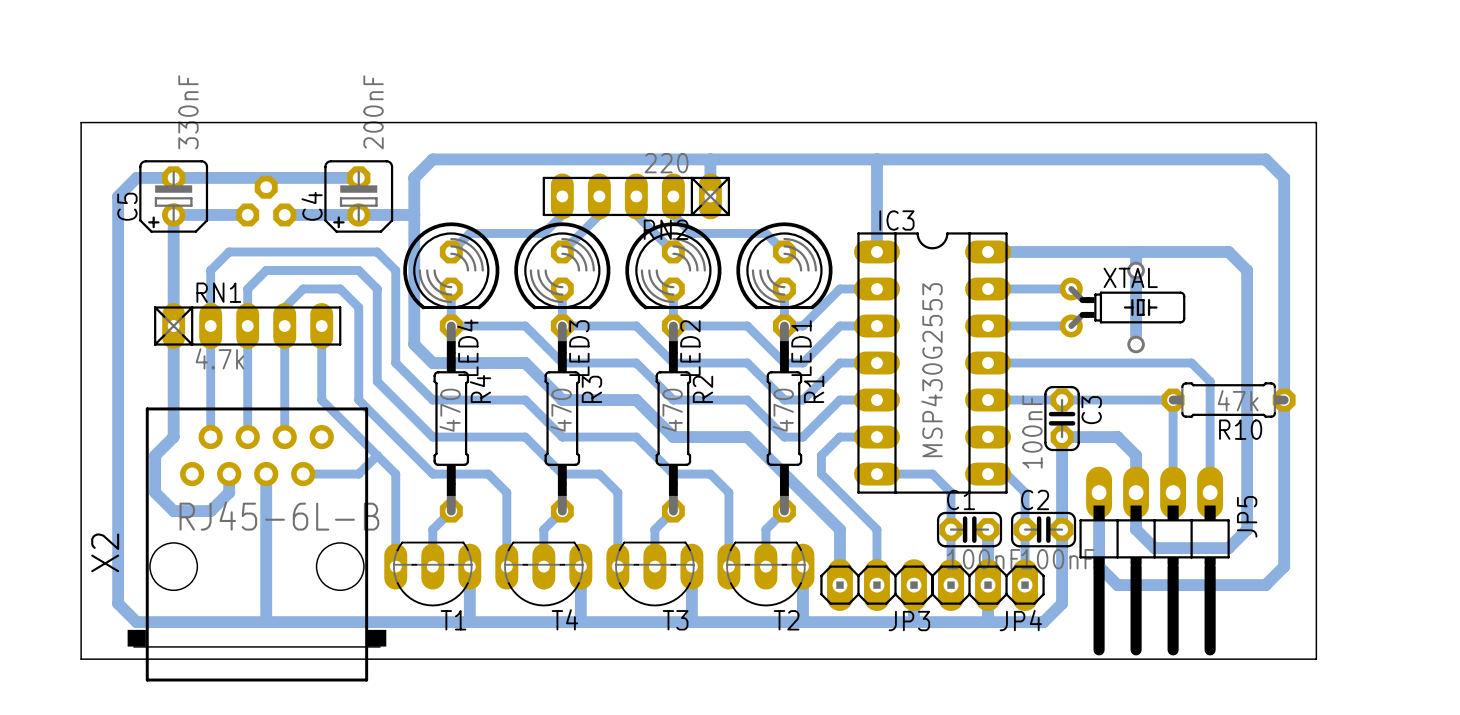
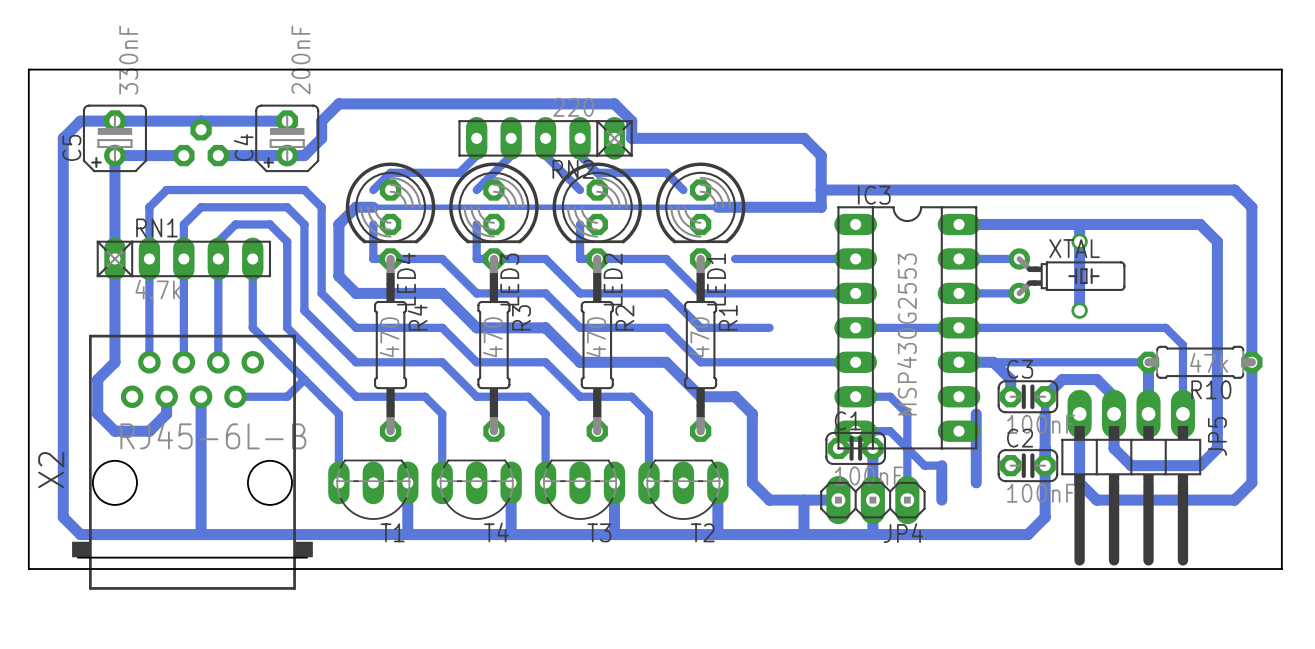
board edge: (1316, 122) (1316, 659) -> (1178, 69) (1281, 69) (1281, 569) (1178, 569)
bottom track: (432, 159) (414, 177) (414, 288) -> (614, 103) (631, 121) (631, 138) (803, 138) (821, 155) (821, 207) (356, 207) (338, 224)
bottom track: (876, 159) (876, 251) -> none
bottom track: (710, 196) (710, 159) (1265, 159) (1284, 177) (1284, 437) -> (993, 362) (1148, 362)
bottom track: (377, 214) (414, 214) -> (304, 155) (321, 138) (321, 121) (338, 103) (356, 103)
bottom track: none -> (821, 190) (872, 190)
bottom track: (1136, 251) (1136, 344) -> (1079, 224) (1079, 310)
bottom track: (1228, 251) (1247, 270) (1247, 474) -> (1096, 190) (1234, 190) (1251, 207) (1251, 482) (1234, 500) (1131, 500)
LED4 position: (451, 265) -> (390, 202)
LED3 position: (562, 265) -> (493, 202)
LED2 position: (673, 265) -> (597, 202)
LED1 position: (784, 265) -> (700, 202)
via: (1136, 270) -> none
bottom track: (784, 288) (784, 326) (802, 326) (839, 288) (876, 288) -> none
bottom track: (988, 288) (1071, 288) -> none
XTAL position: (1122, 307) -> (1067, 276)
via: none -> (1079, 241)
bottom track: (747, 326) (784, 363) (802, 363) (839, 326) -> (648, 258) (666, 258) (700, 293) (735, 293)
bottom track: none -> (769, 258) (855, 258)
bottom track: (988, 326) (1071, 326) -> none
bottom track: none -> (959, 258) (1019, 258)
via: (1136, 344) -> none
bottom track: (747, 363) (784, 400) (802, 400) (839, 363) -> (648, 293) (666, 293) (700, 327) (735, 327)
IC3 position: (932, 363) -> (907, 327)
bottom track: (988, 363) (1080, 363) -> (769, 293) (855, 293)
bottom track: (1145, 363) (1191, 363) (1210, 381) (1210, 492) -> none
via: none -> (1079, 310)
bottom track: (747, 400) (784, 437) (802, 437) (839, 400) -> (648, 327) (666, 327) (700, 362) (735, 362)
bottom track: (1173, 400) (1173, 474) -> (1114, 396) (1096, 379) (1062, 379) (1045, 396)
bottom track: none -> (1045, 327) (1165, 327) (1182, 345) (1182, 413)
R10 position: (1228, 400) -> (1200, 362)
R4 position: (451, 418) -> (390, 345)
R3 position: (562, 418) -> (493, 345)
R2 position: (673, 418) -> (597, 345)
R1 position: (784, 418) -> (700, 345)
C3 rotation: 0° (1062, 418) -> 90° counterclockwise (1027, 396)
C3 position: (1062, 418) -> (1027, 396)
bottom track: (747, 437) (839, 529) (839, 585) -> (648, 362) (666, 362) (700, 396) (735, 396) (752, 413) (752, 482) (769, 500) (838, 500)
bottom track: (839, 437) (821, 455) (821, 474) (876, 529) (876, 585) -> none
bottom track: none -> (769, 362) (855, 362)
bottom track: (1080, 437) (1062, 437) (1062, 548) -> (855, 431) (890, 431) (924, 465) (941, 465)
bottom track: (395, 474) (395, 566) -> (321, 396) (338, 413) (338, 482)
bottom track: (488, 474) (506, 492) (506, 566) -> (407, 396) (425, 396) (442, 413) (442, 482)
bottom track: (599, 474) (617, 492) (617, 566) -> (511, 396) (528, 396) (545, 413) (545, 482)
bottom track: (710, 474) (728, 492) (728, 566) -> (614, 396) (631, 396) (648, 413) (648, 482)
bottom track: (876, 474) (932, 474) (951, 492) (951, 585) -> none
bottom track: (1136, 474) (1136, 529) (1154, 548) (1228, 548) (1247, 529) -> (959, 224) (1200, 224) (1217, 241) (1217, 448) (1200, 465) (1131, 465) (1114, 448)
bottom track: (1284, 492) (1284, 566) (1265, 585) -> none
bottom track: (451, 511) (432, 529) (432, 566) -> none
bottom track: (562, 511) (543, 529) (543, 566) -> none
bottom track: (673, 511) (654, 529) (654, 566) -> none
bottom track: (784, 511) (765, 529) (765, 566) -> none
C2 position: (1043, 529) -> (1027, 465)
JP5 position: (1154, 561) -> (1131, 477)
bottom track: (469, 566) (469, 622) -> (407, 482) (407, 534)
bottom track: (580, 566) (580, 622) -> (511, 482) (511, 534)
bottom track: (691, 566) (691, 622) -> (614, 482) (614, 534)
bottom track: (802, 566) (802, 622) -> (717, 482) (717, 534)
bottom track: (1099, 566) (1117, 585) (1228, 585) -> (1079, 413) (1079, 482) (1096, 500)
T1 position: (432, 574) -> (373, 489)
T4 position: (543, 574) -> (476, 489)
T3 position: (654, 574) -> (580, 489)
T2 position: (765, 574) -> (683, 489)
JP3: (876, 585) -> none
bottom track: (1062, 585) (1062, 603) (1043, 622) -> (1045, 413) (1045, 517) (1027, 534) (924, 534)

